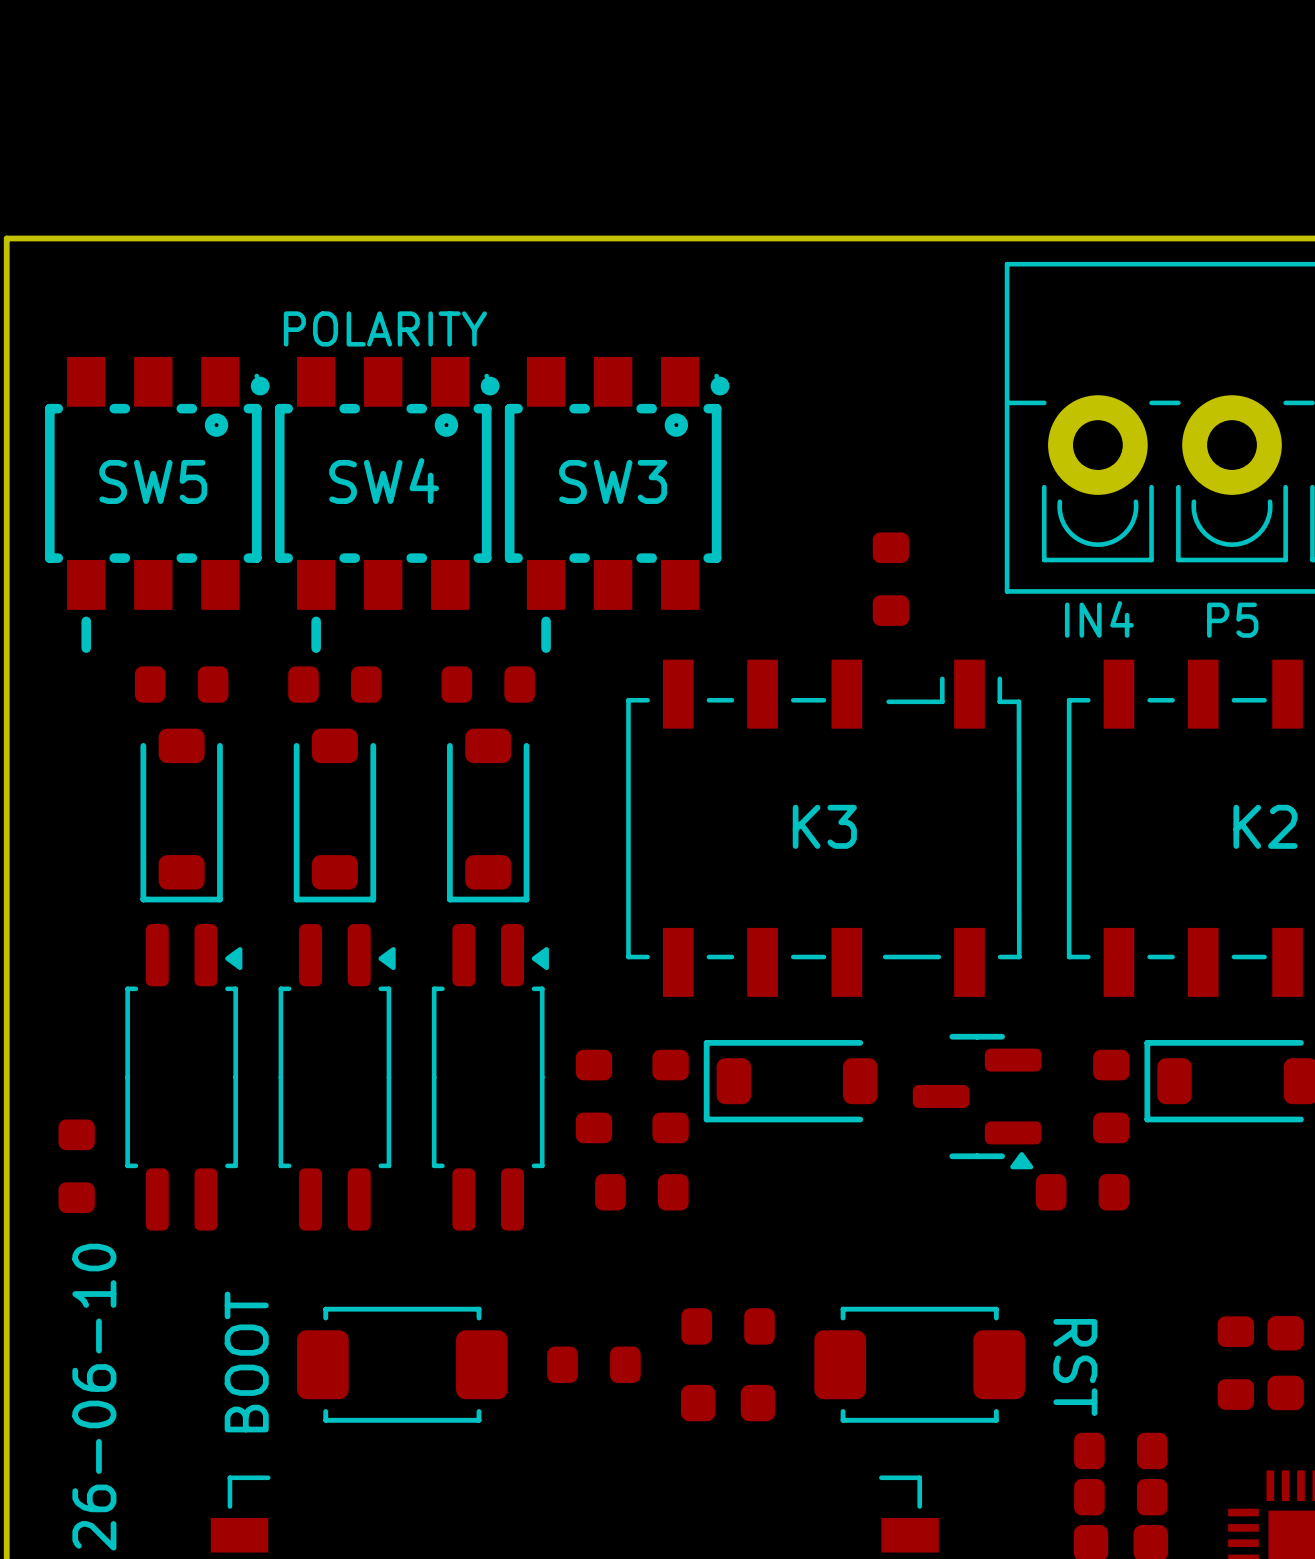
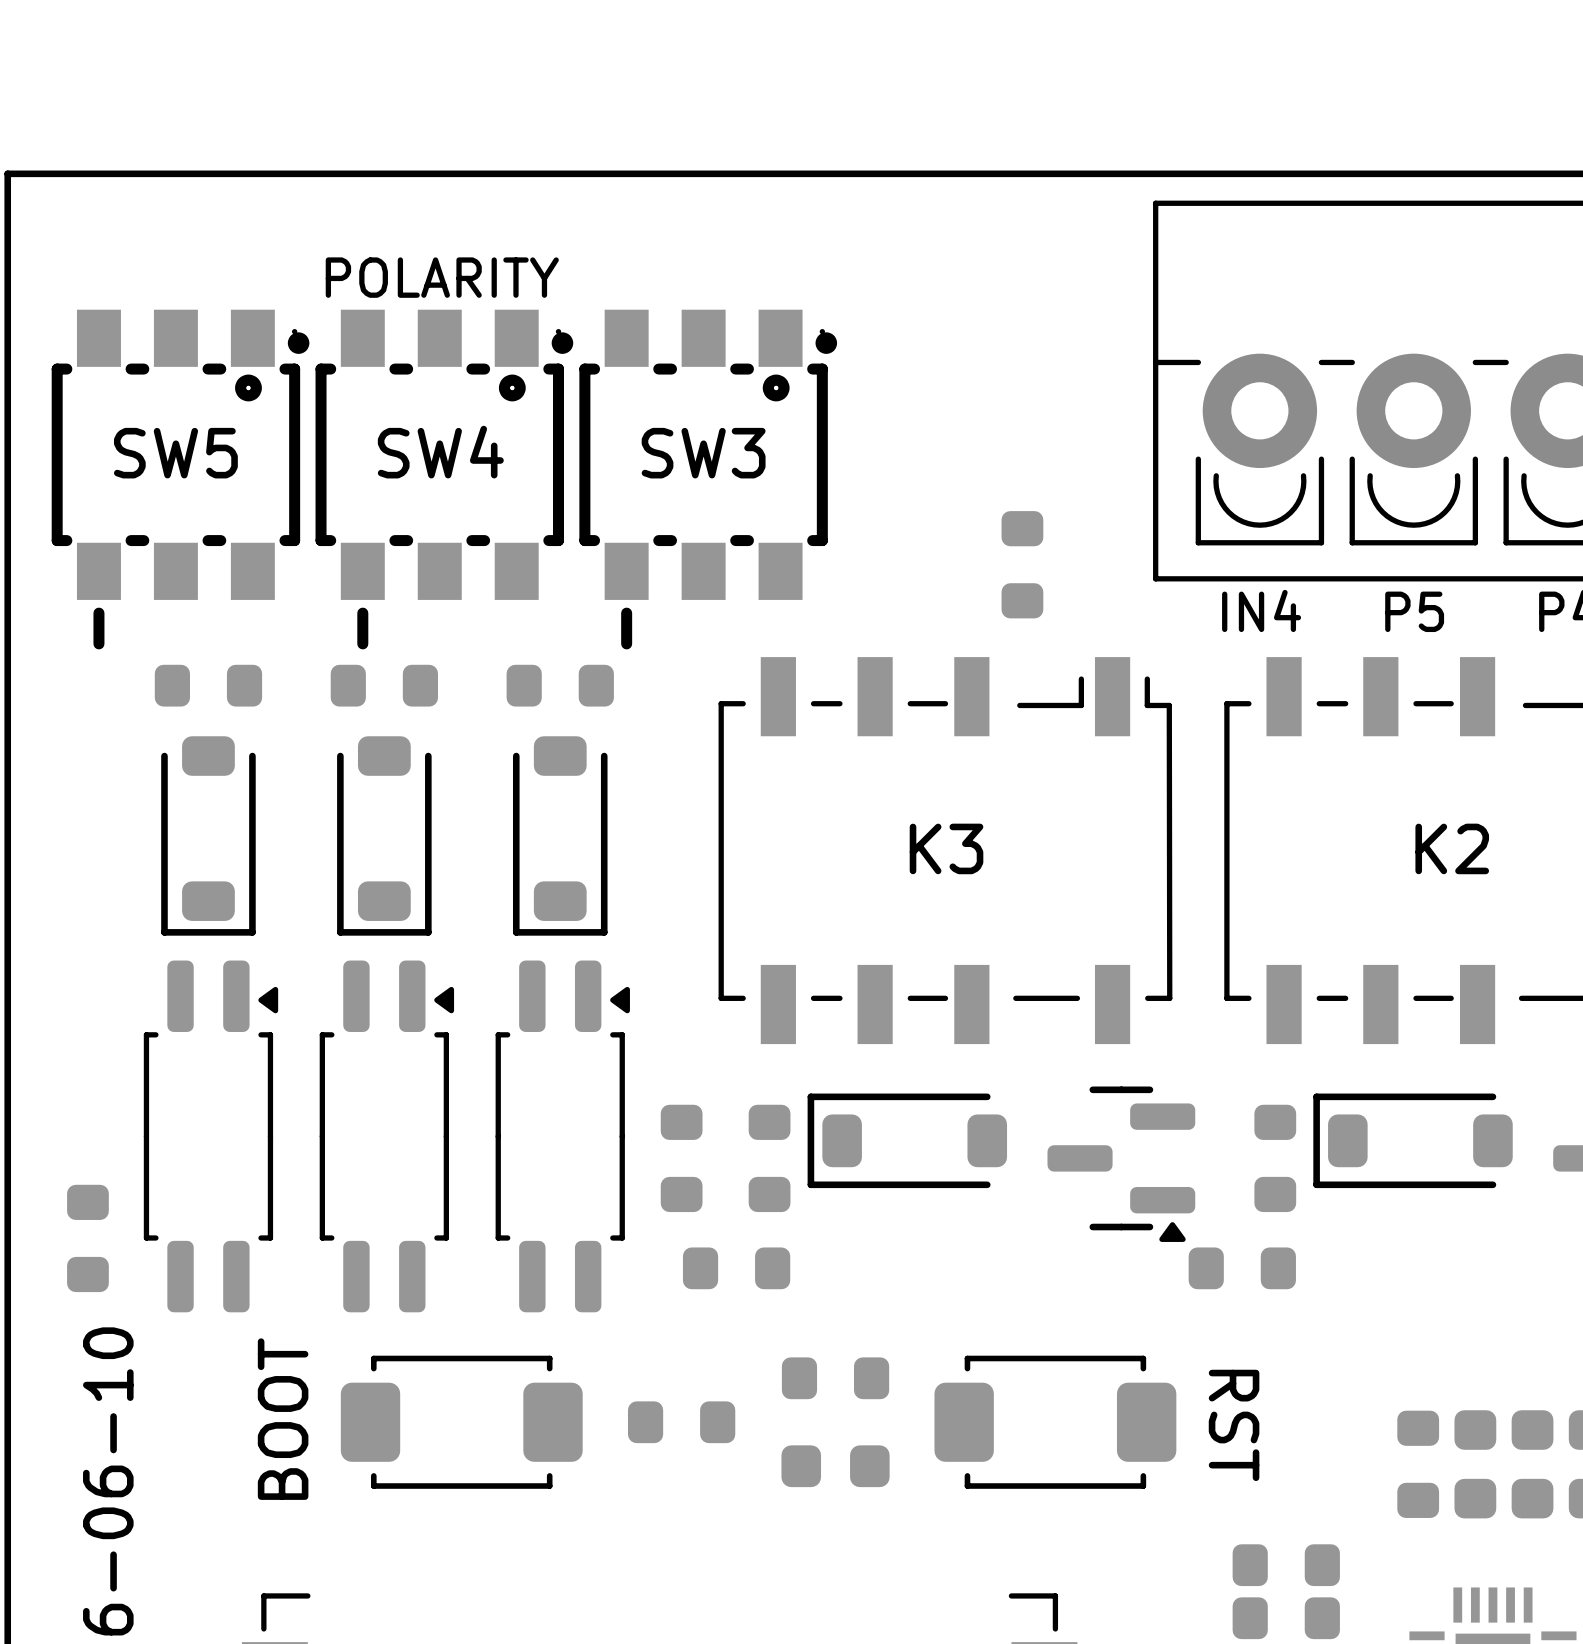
part position: (728, 1326) -> (835, 1378)
text position: BOOT (246, 1362) -> BOOT (283, 1419)
part position: (402, 1364) -> (461, 1422)
part position: (593, 1364) -> (681, 1422)
part position: (919, 1364) -> (1055, 1422)
text position: RST (1075, 1367) -> RST (1234, 1425)
part position: (728, 1403) -> (835, 1466)

